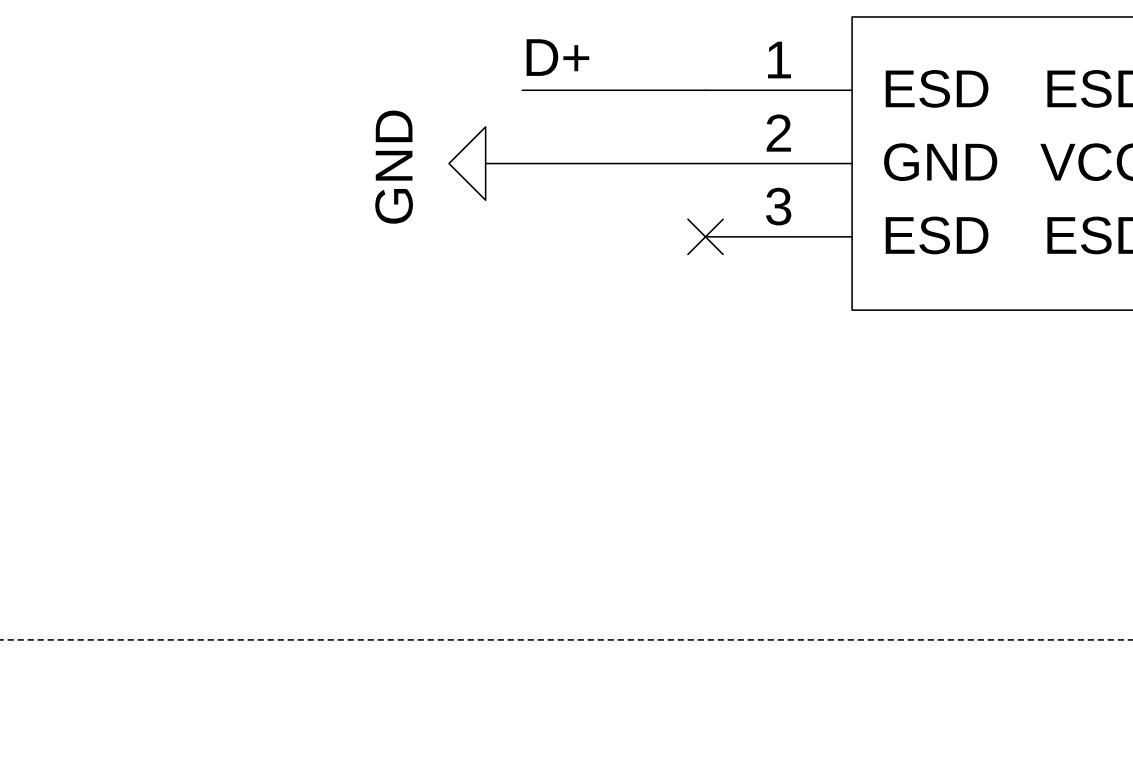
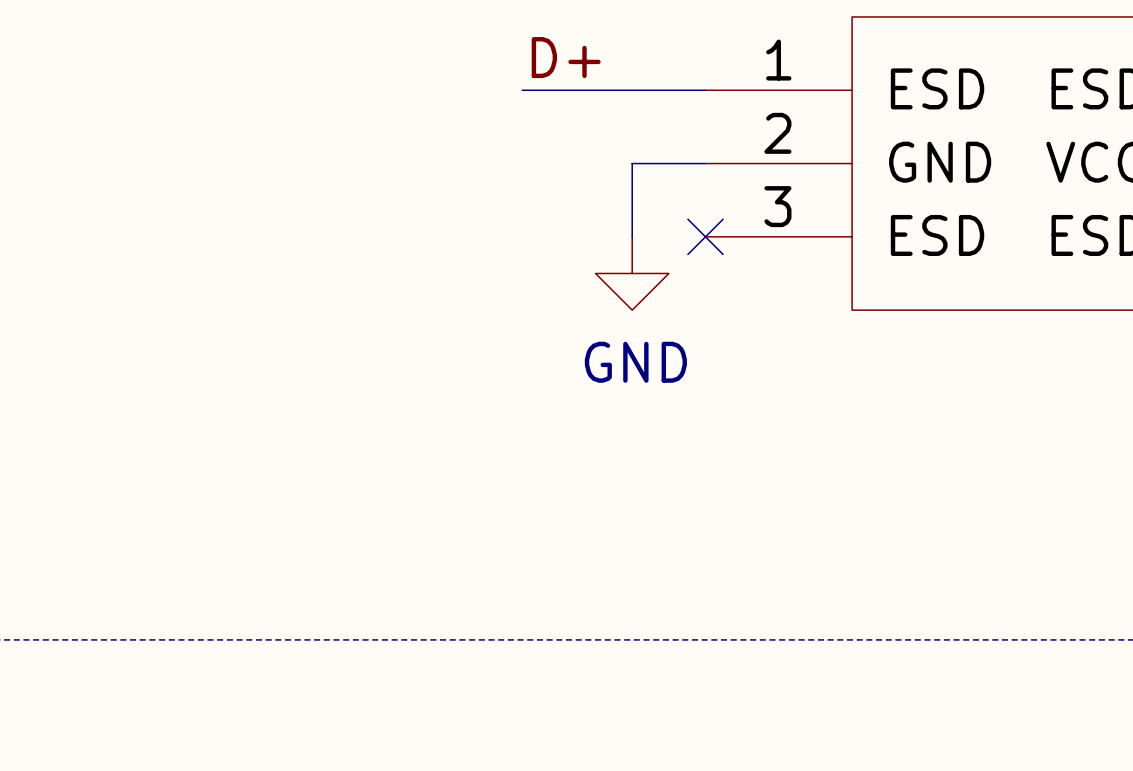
power symbol rotation: 0° (485, 163) -> 90° counterclockwise (632, 273)
power symbol position: GND (485, 163) -> GND (632, 273)
wire: (522, 163) (632, 163) -> (632, 236) (632, 163)

